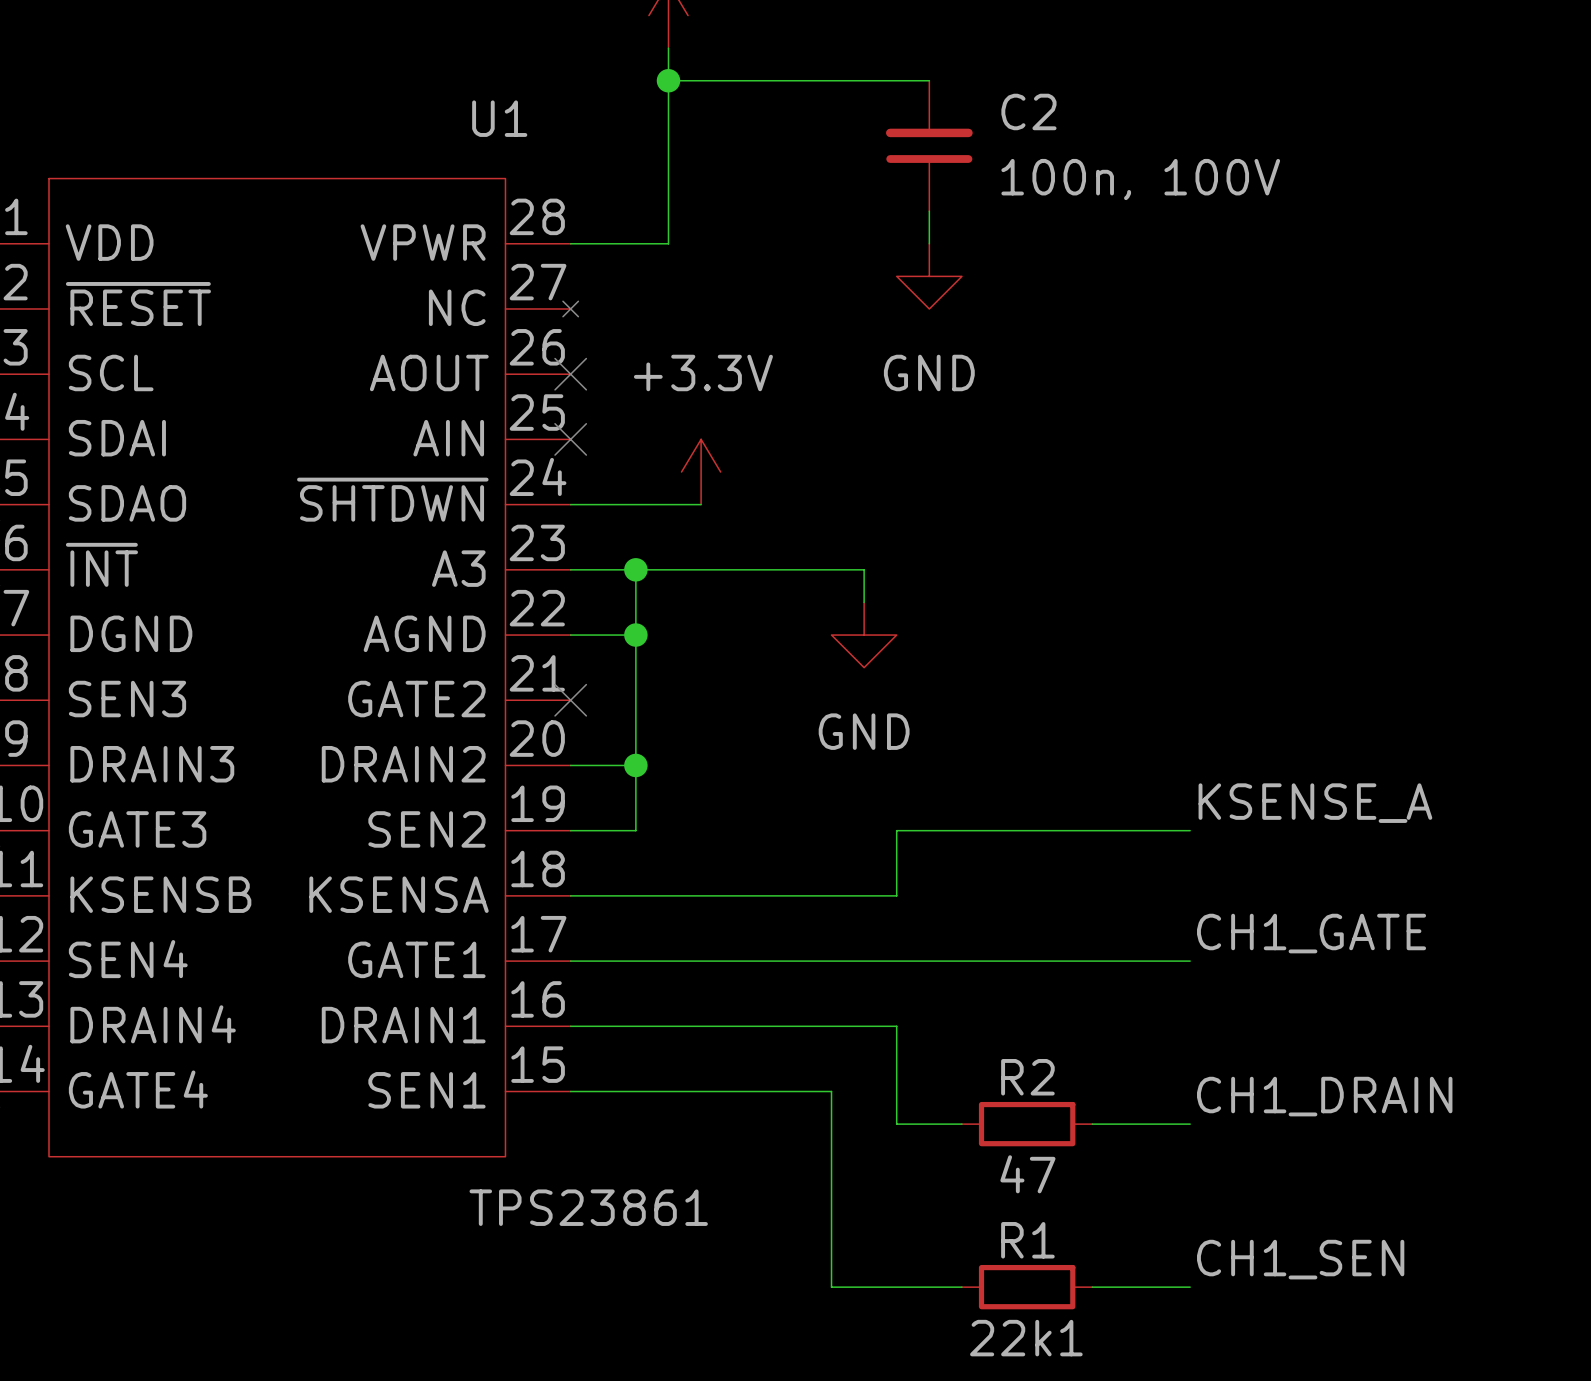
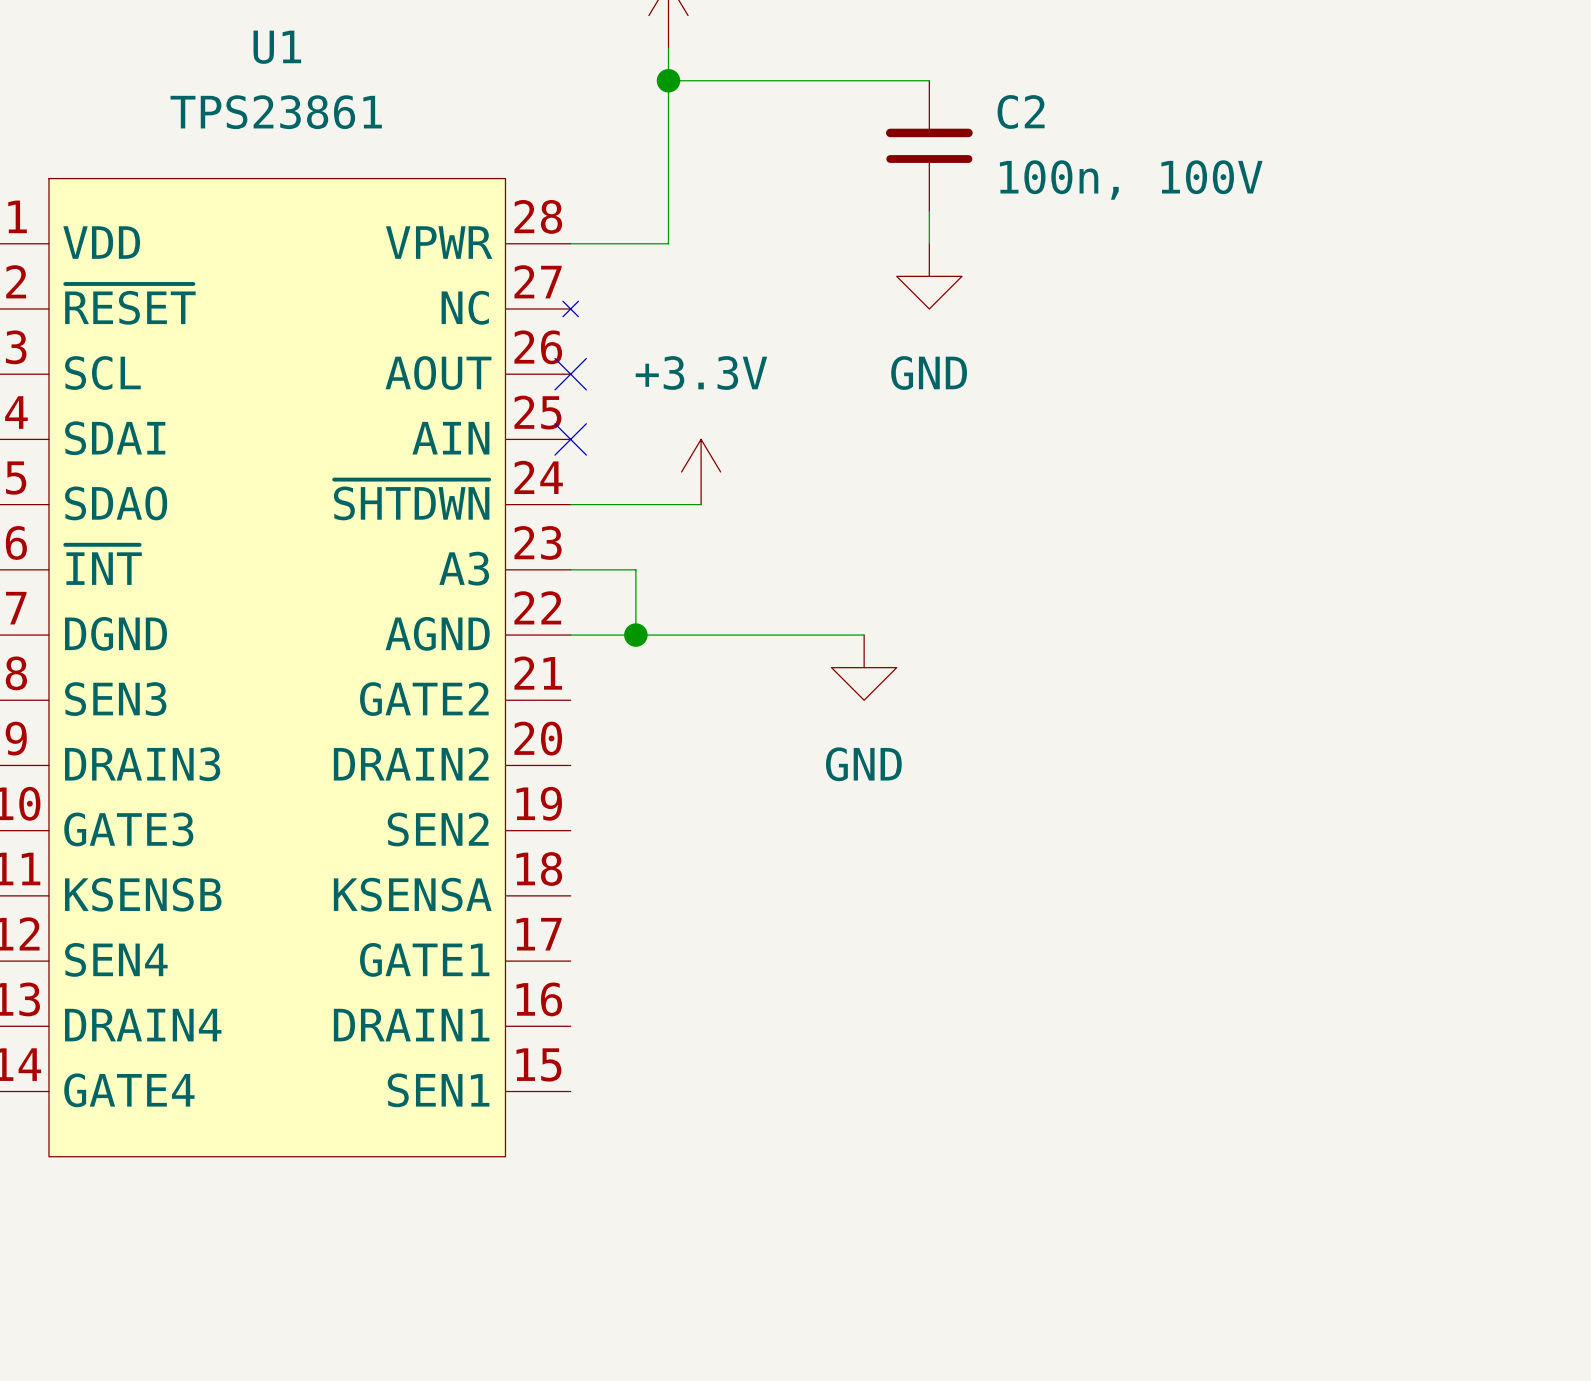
U1 name position: U1 (499, 118) -> U1 (277, 47)
wire: (635, 569) (864, 569) (864, 602) -> none
junction: (635, 569) -> none
wire: (635, 635) (635, 830) (570, 830) -> (635, 635) (864, 635)
power symbol position: GND (864, 635) -> GND (864, 667)
no-connect mark: (570, 700) -> none
wire: (570, 765) (635, 765) -> none
junction: (635, 765) -> none
label: KSENSE_A (1315, 803) -> none
wire: (1190, 830) (896, 830) (896, 895) (570, 895) -> none
label: CH1_GATE (1311, 933) -> none
wire: (570, 961) (1190, 961) -> none
wire: (570, 1026) (896, 1026) (896, 1124) (961, 1124) -> none
wire: (570, 1091) (831, 1091) (831, 1287) (961, 1287) -> none
label: CH1_DRAIN (1324, 1096) -> none
R2: 47 (1027, 1124) -> none
wire: (1092, 1124) (1190, 1124) -> none
U1 value position: TPS23861 (588, 1207) -> TPS23861 (276, 112)
label: CH1_SEN (1300, 1259) -> none
R1: 22k1 (1027, 1287) -> none
wire: (1092, 1287) (1190, 1287) -> none

